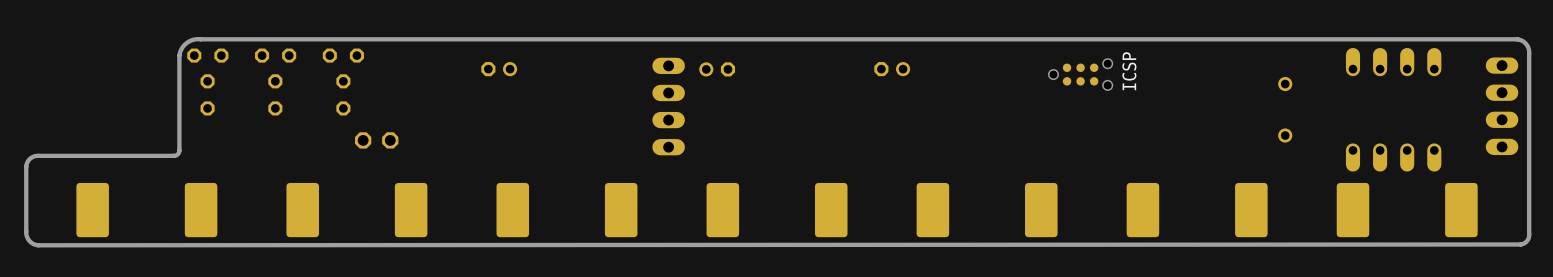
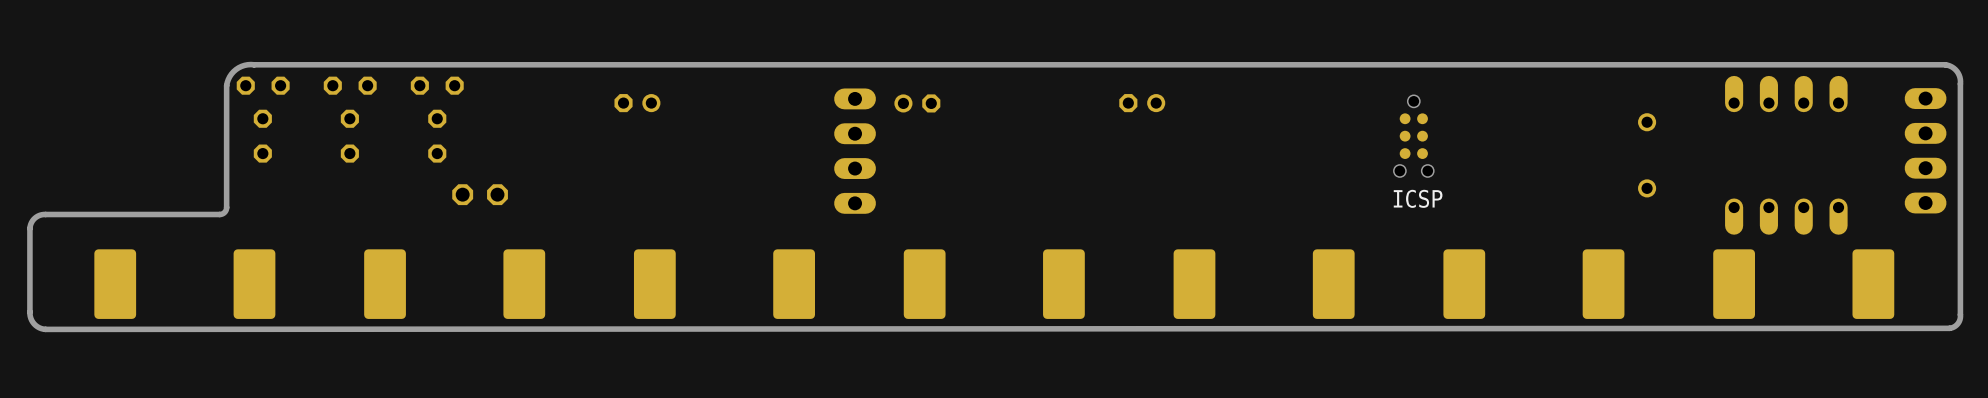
ICSP rotation: 0° (1080, 74) -> 90° clockwise (1413, 136)

